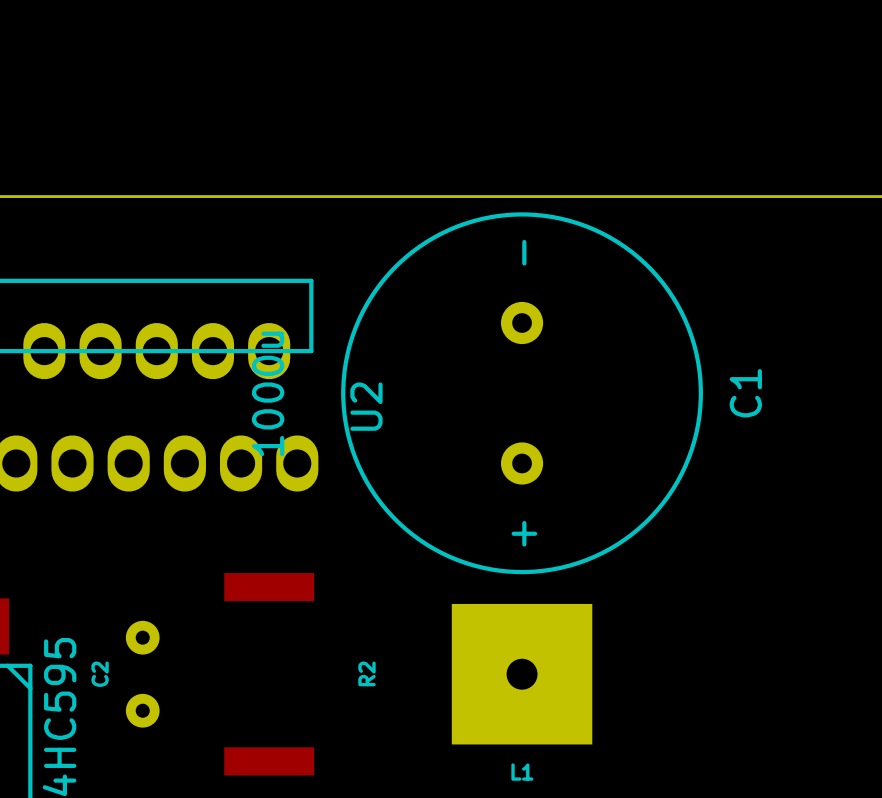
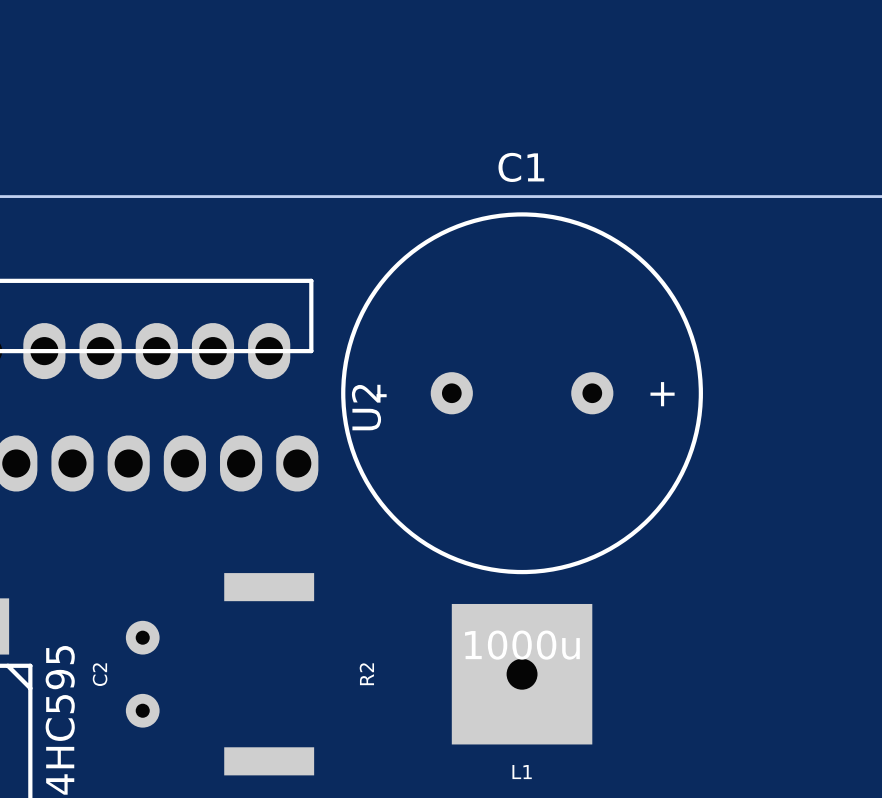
C1 rotation: 0° (522, 393) -> 90° counterclockwise (522, 393)

